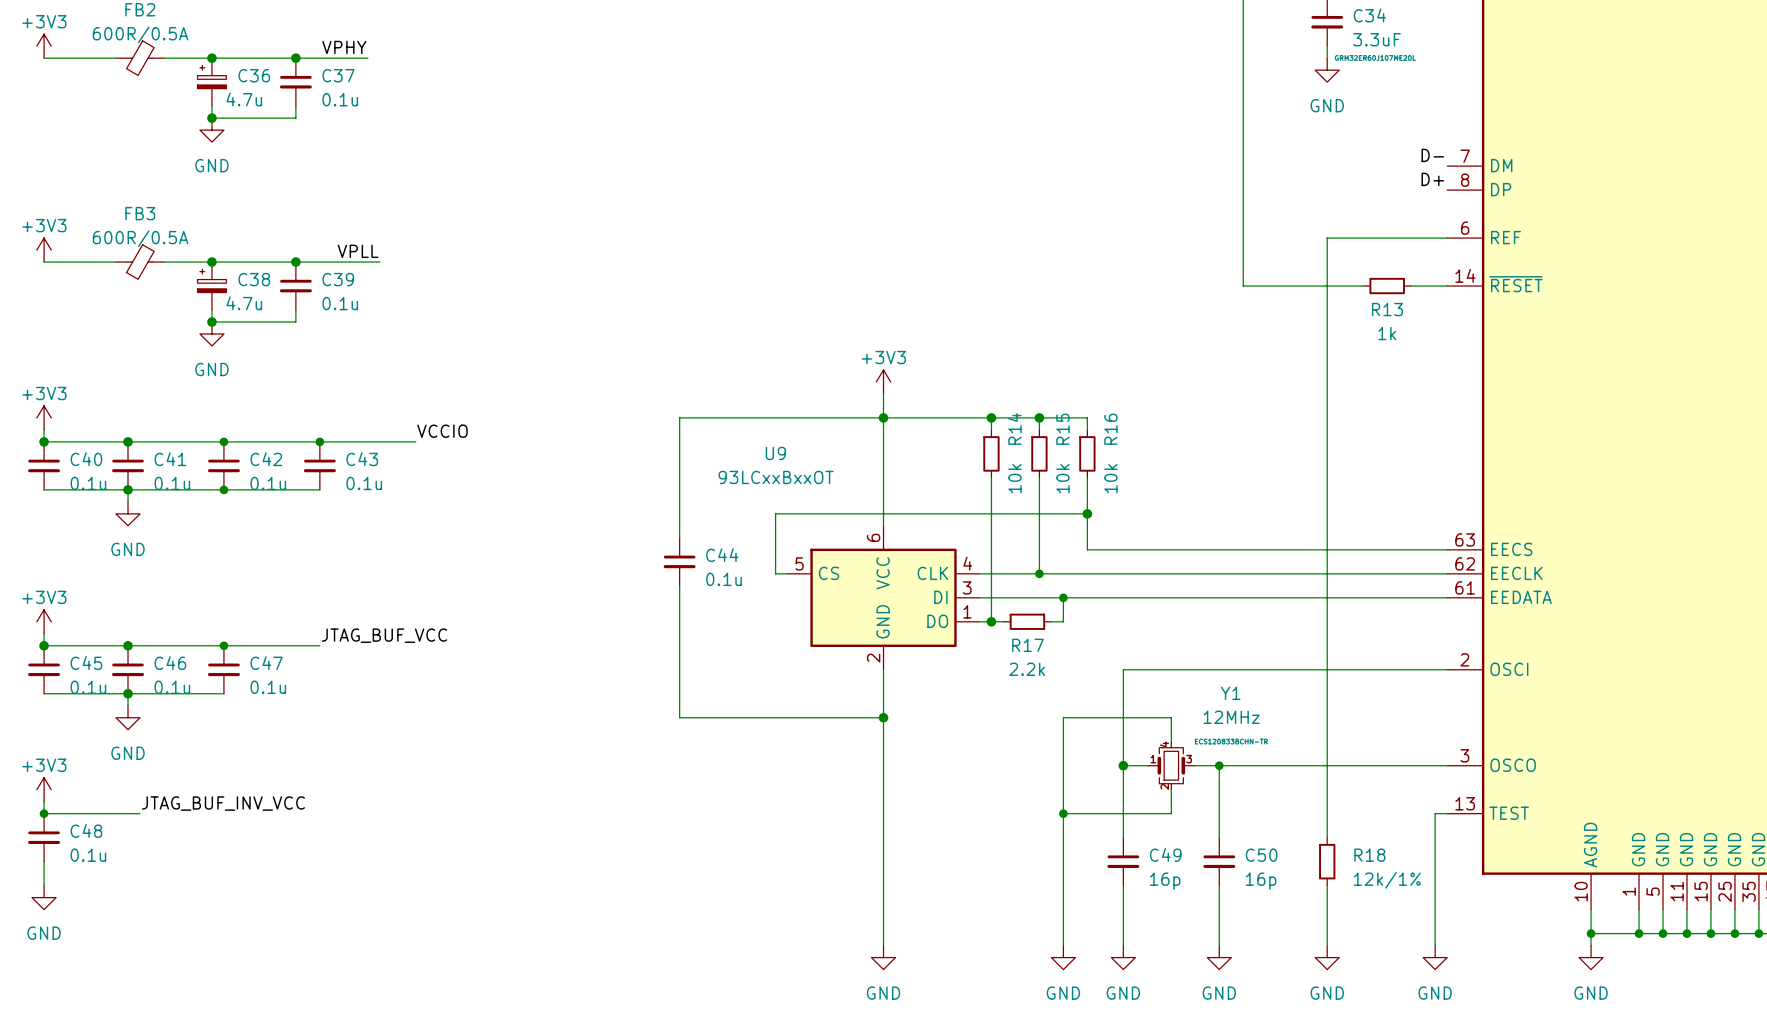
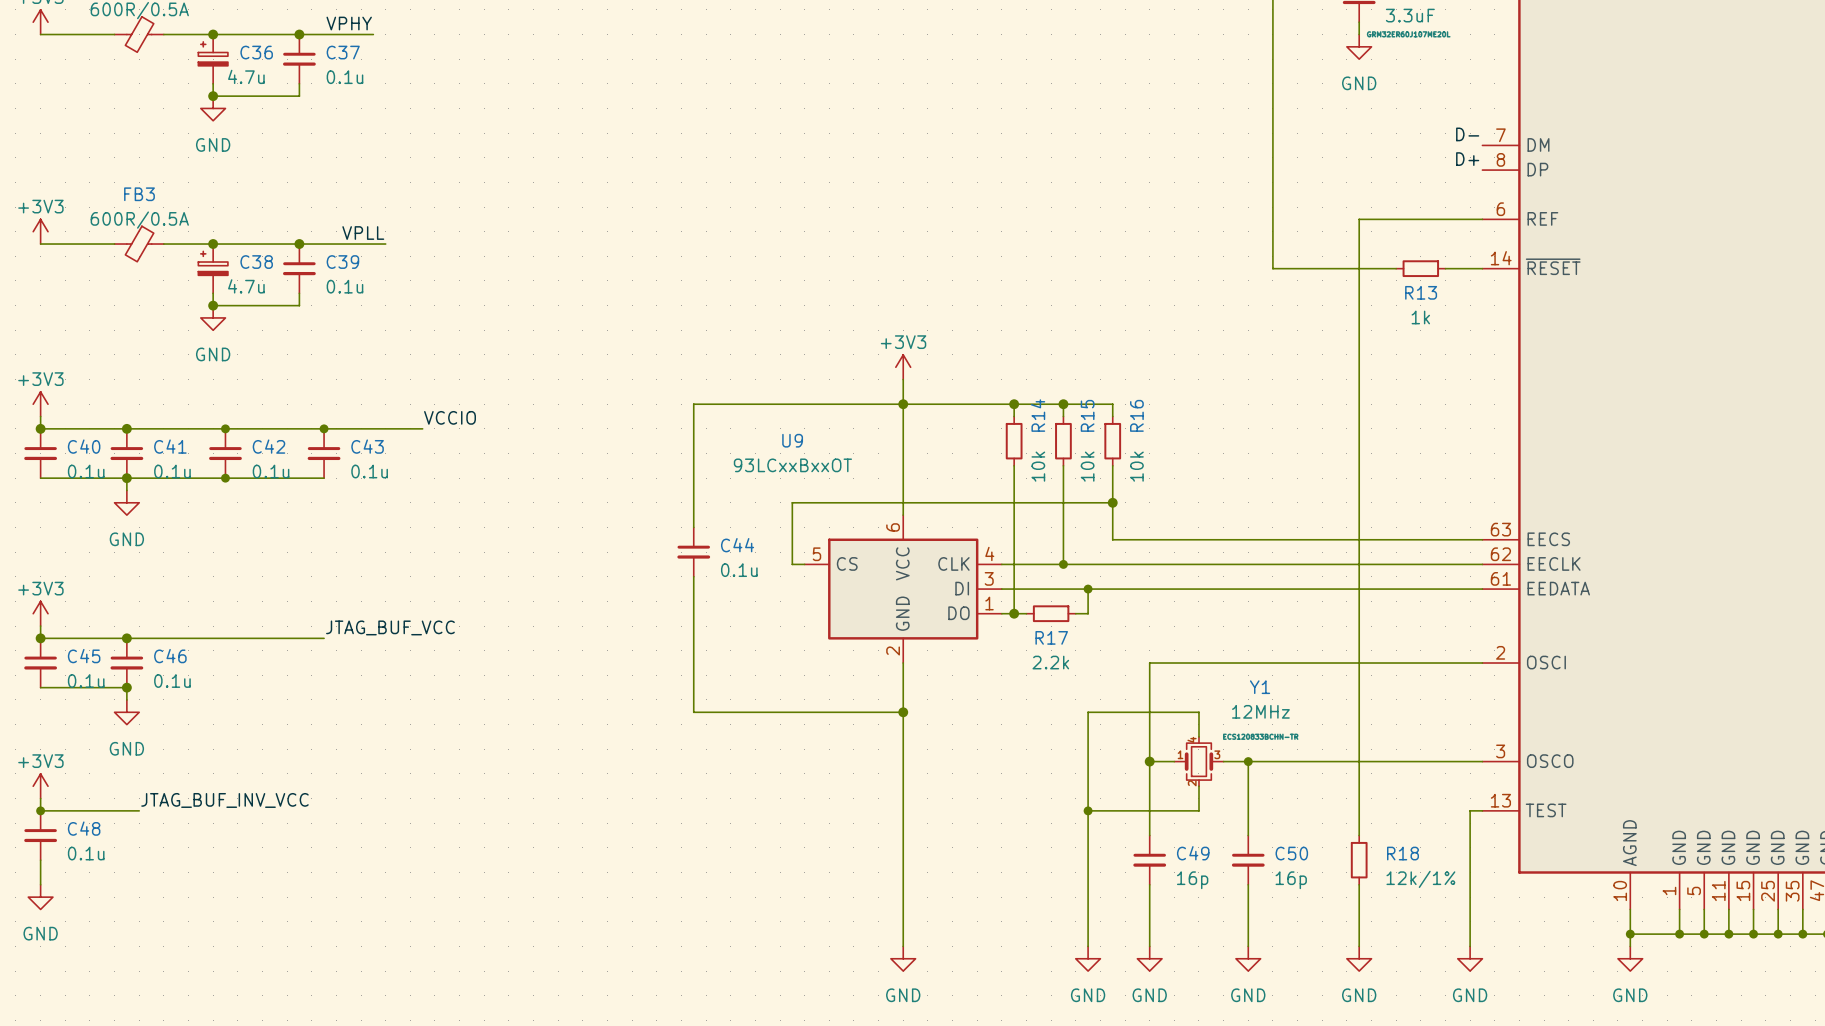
junction: (223, 645) -> none
C47: 0.1u (223, 669) -> none
wire: (128, 693) (223, 693) -> none

